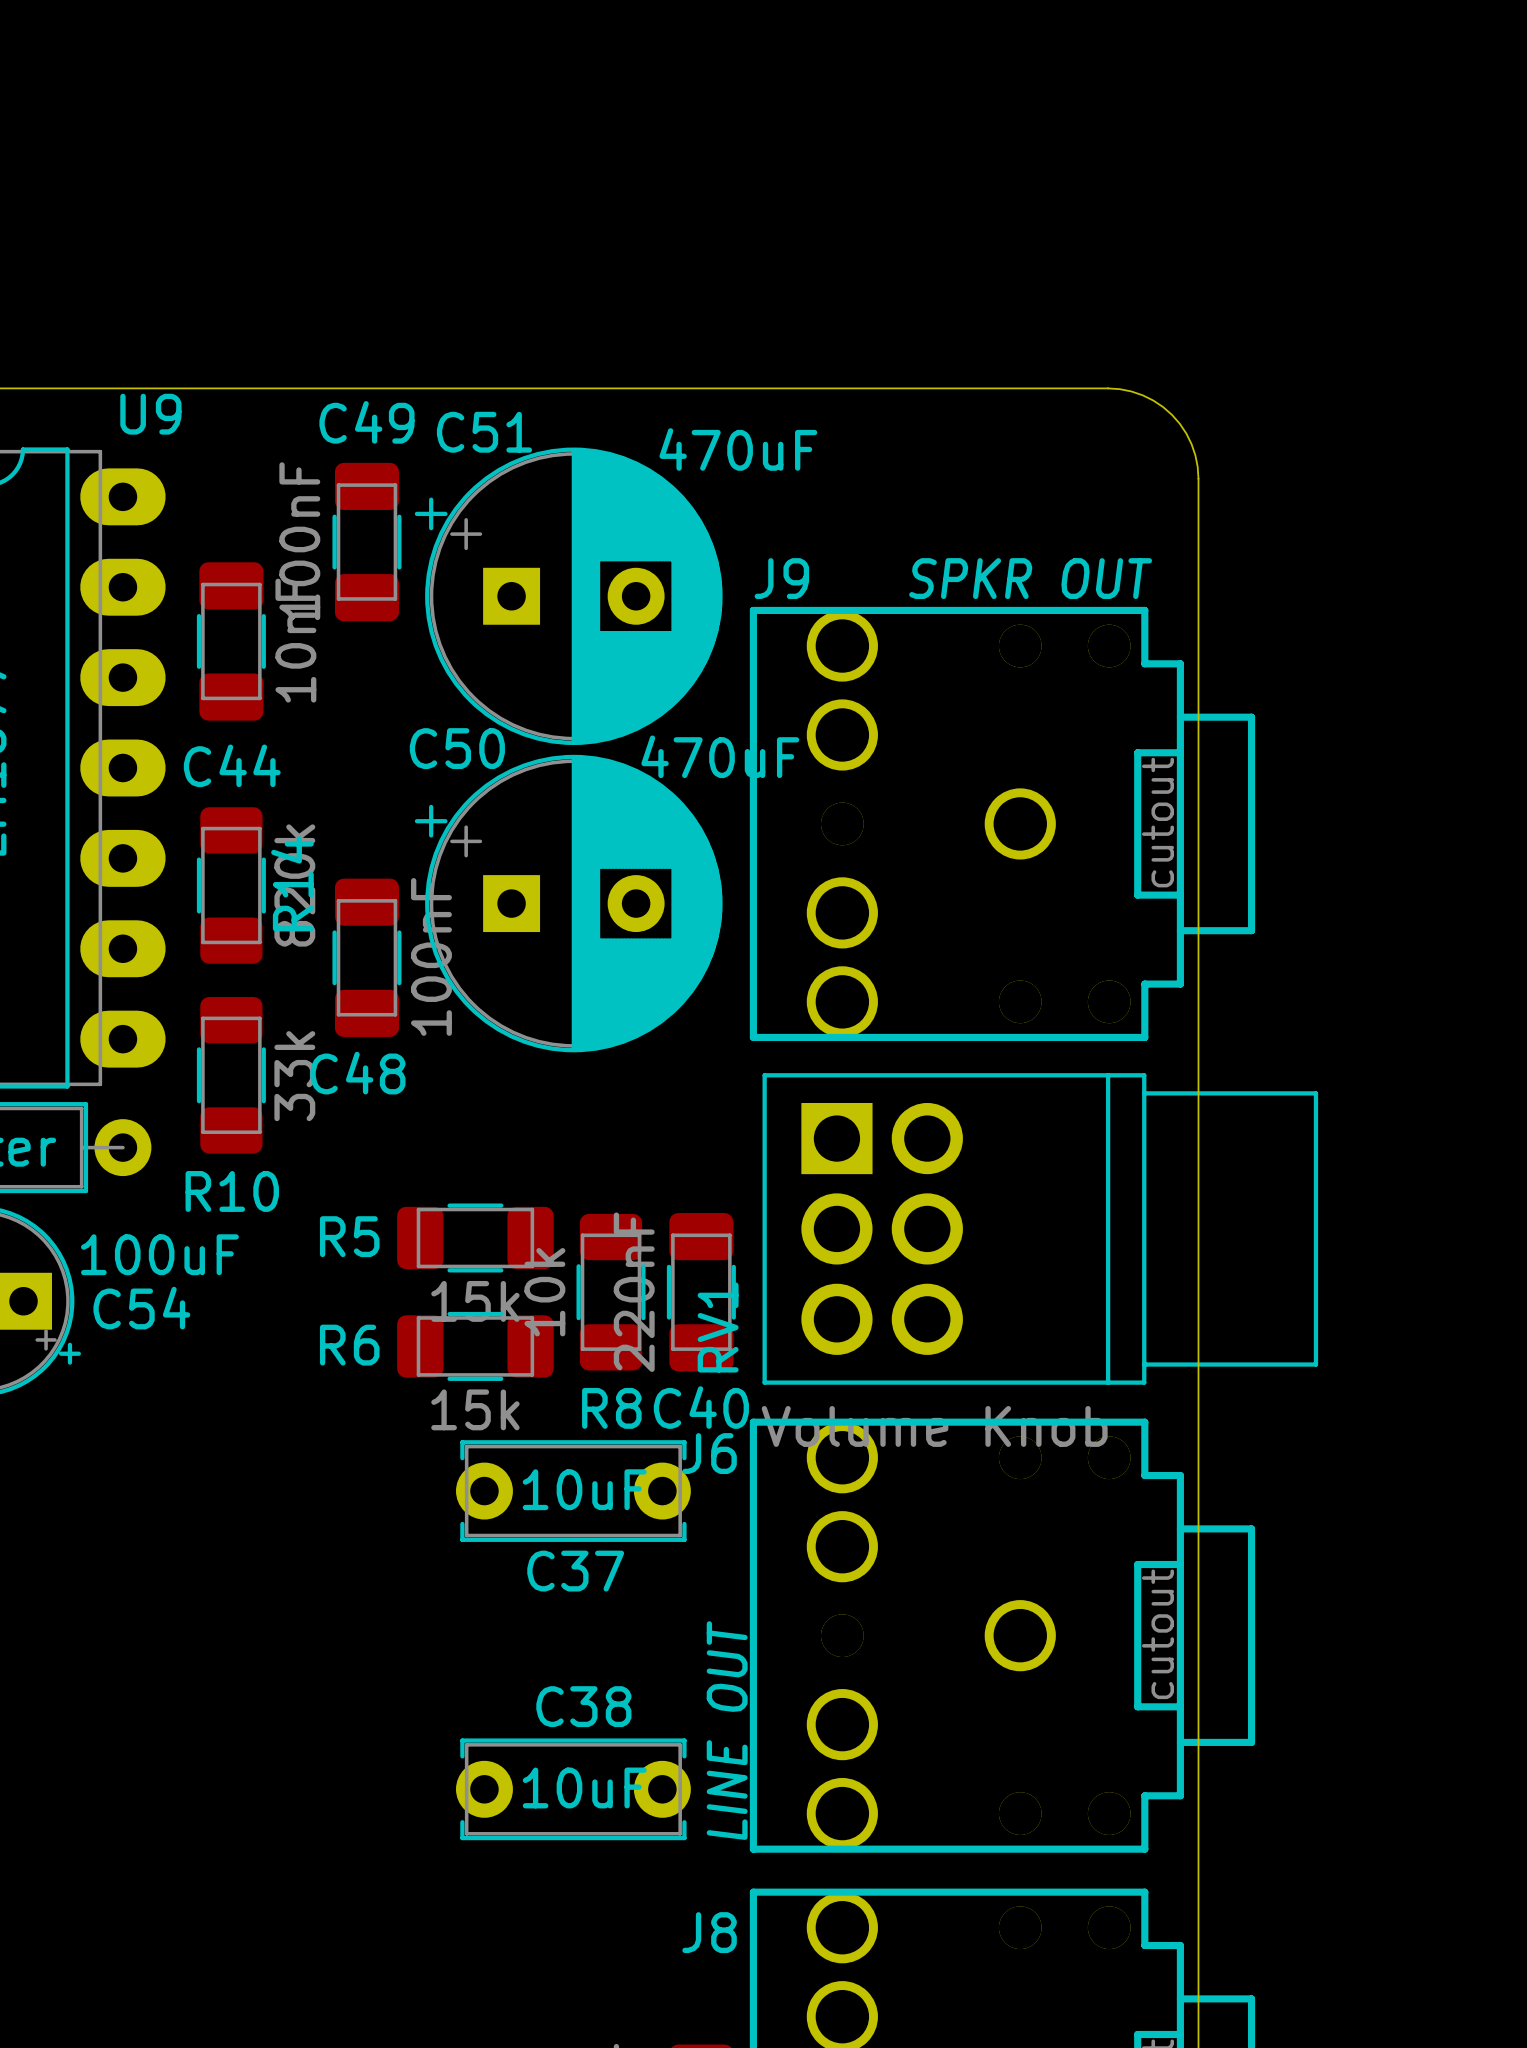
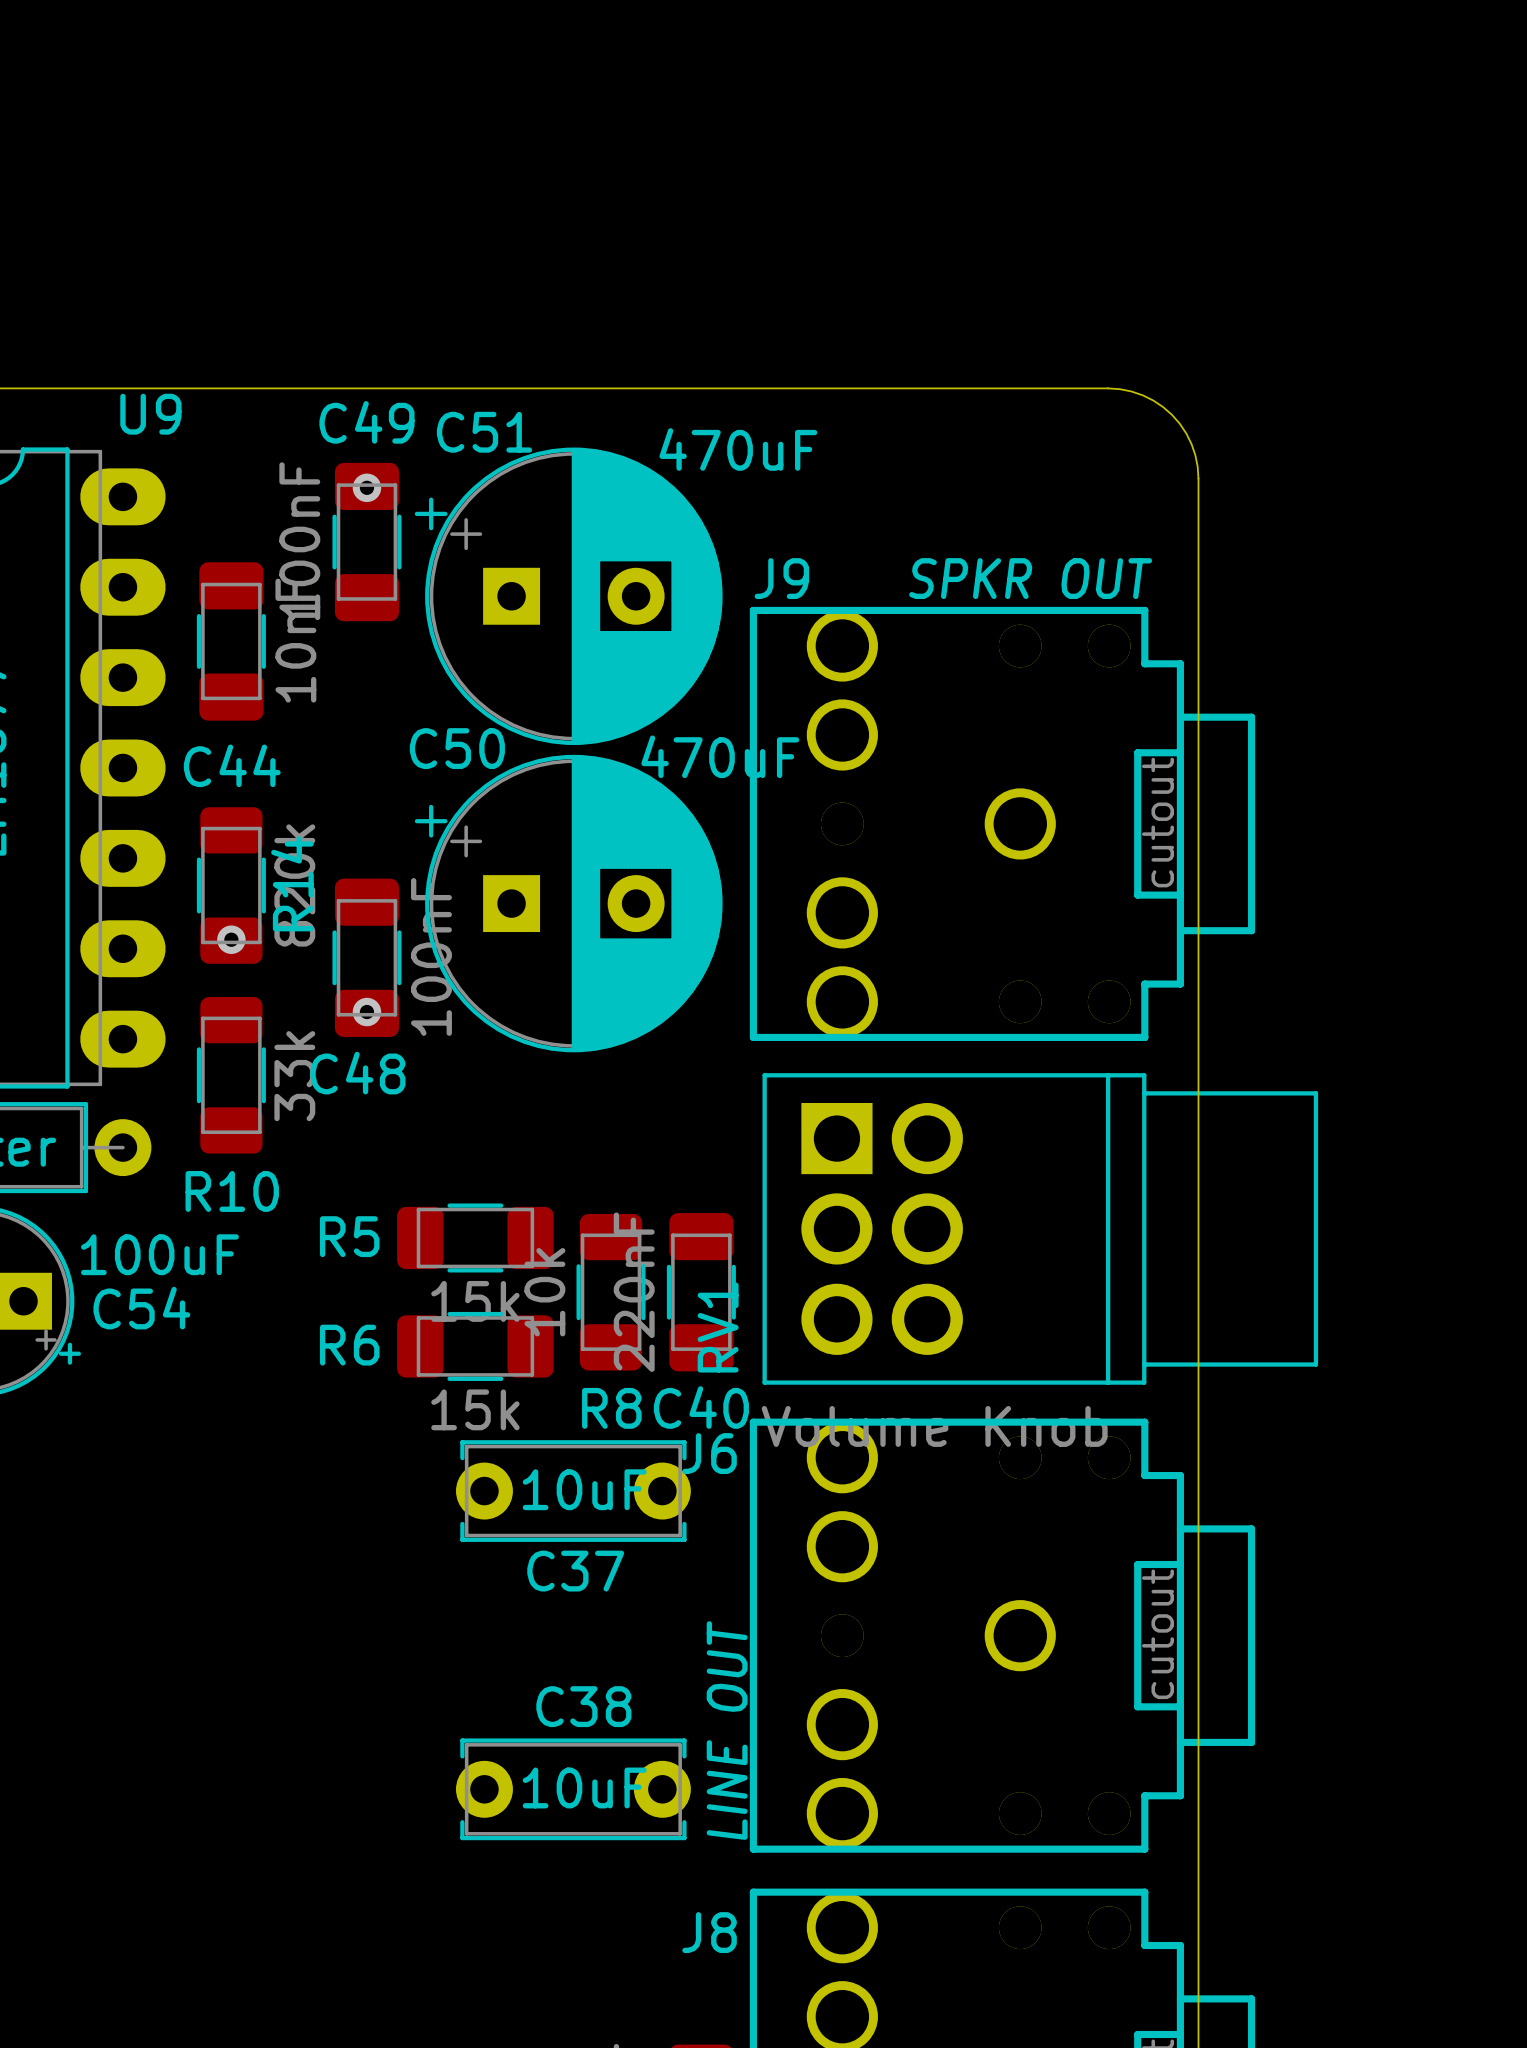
via: none -> (366, 487)
via: none -> (231, 939)
via: none -> (366, 1012)

